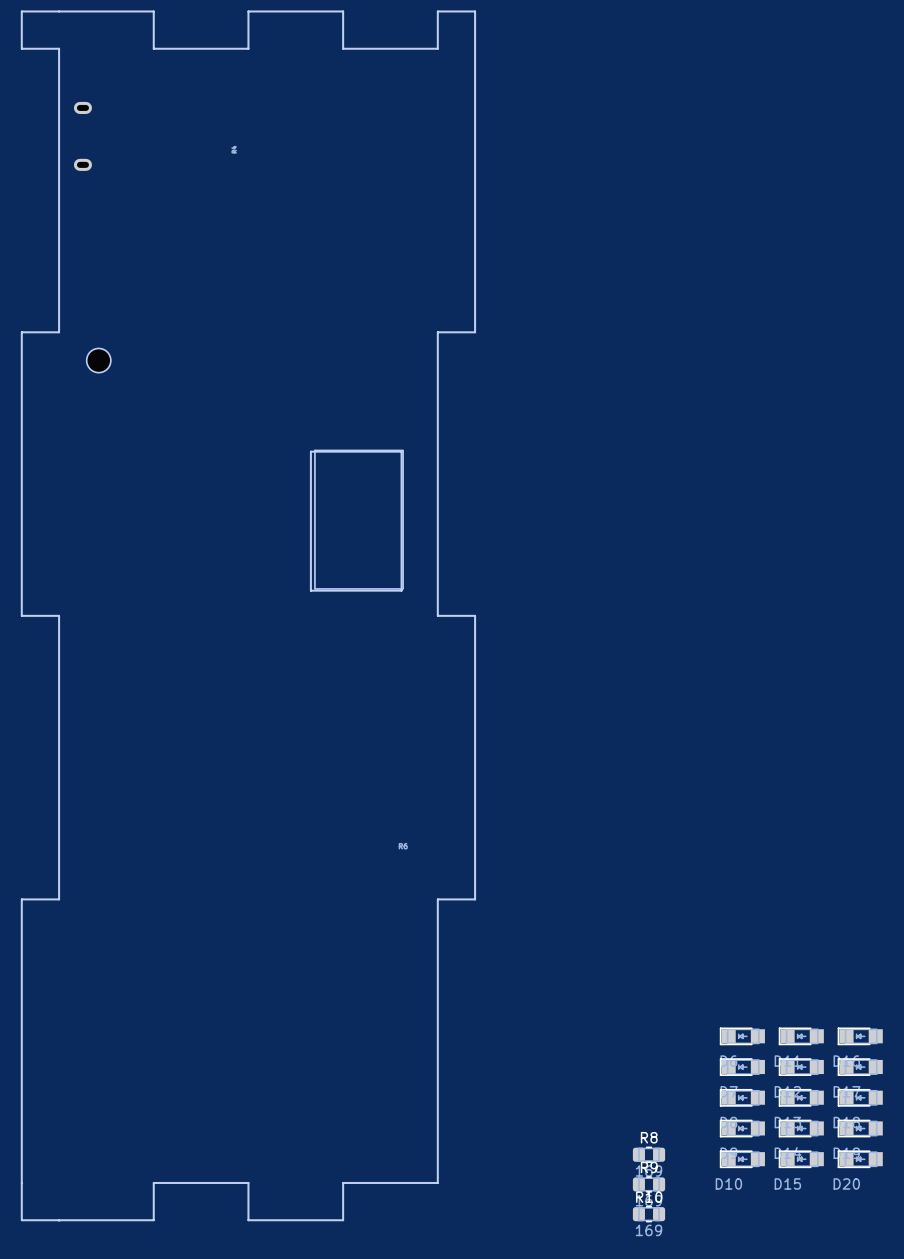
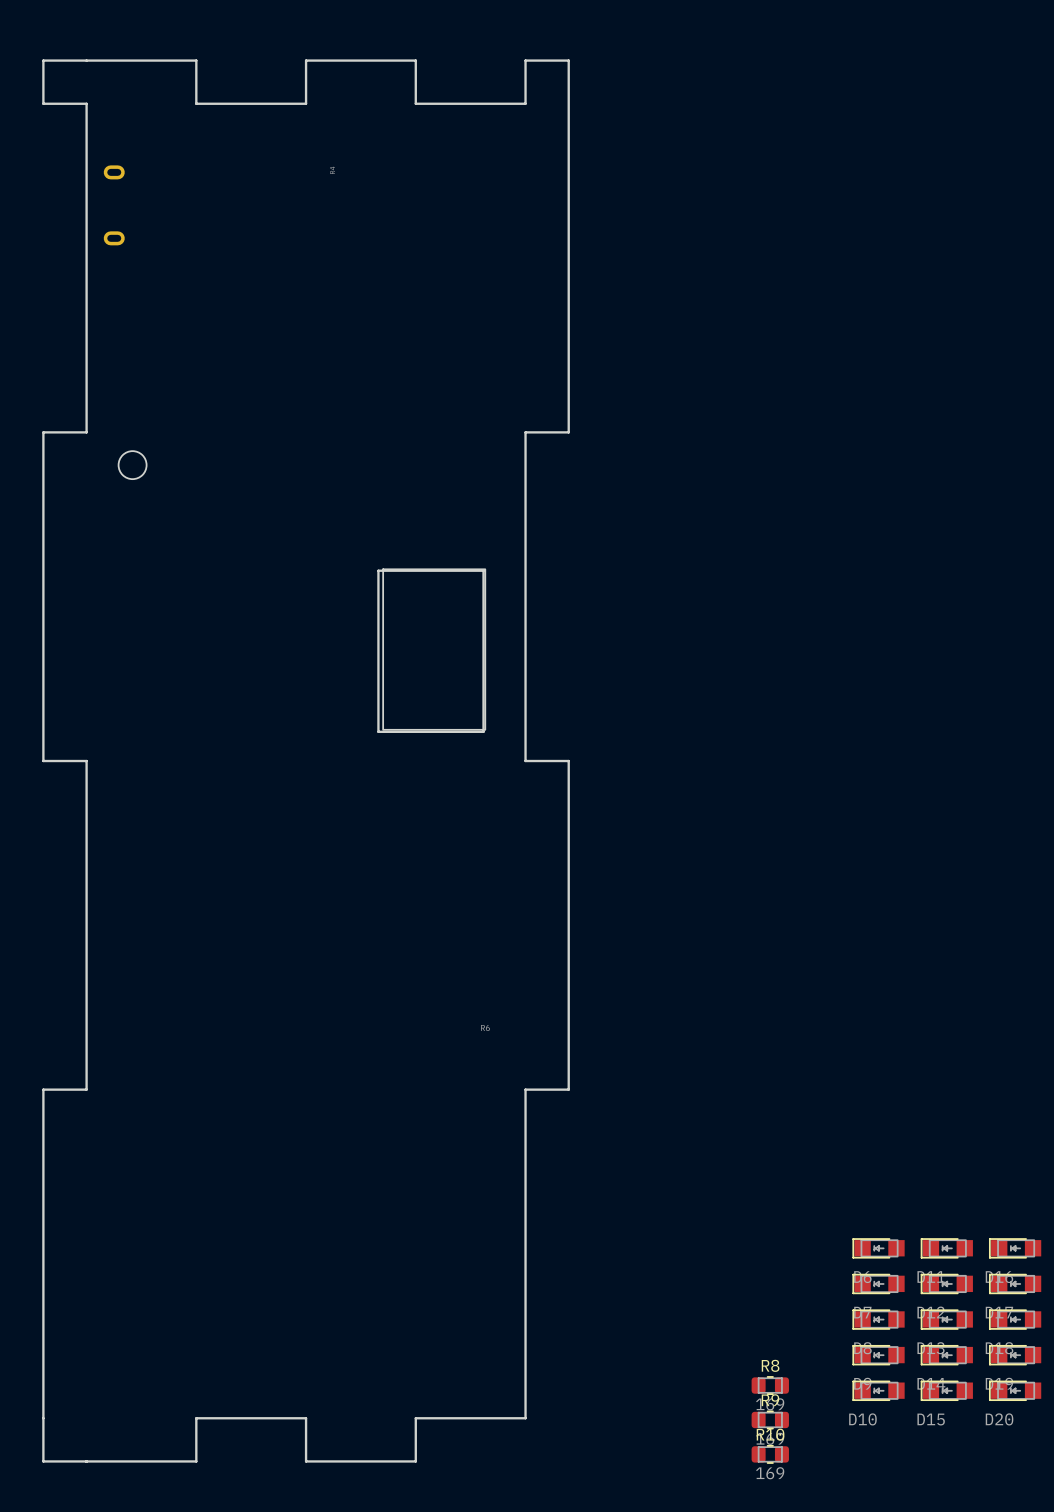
part position: (234, 149) -> (332, 170)

